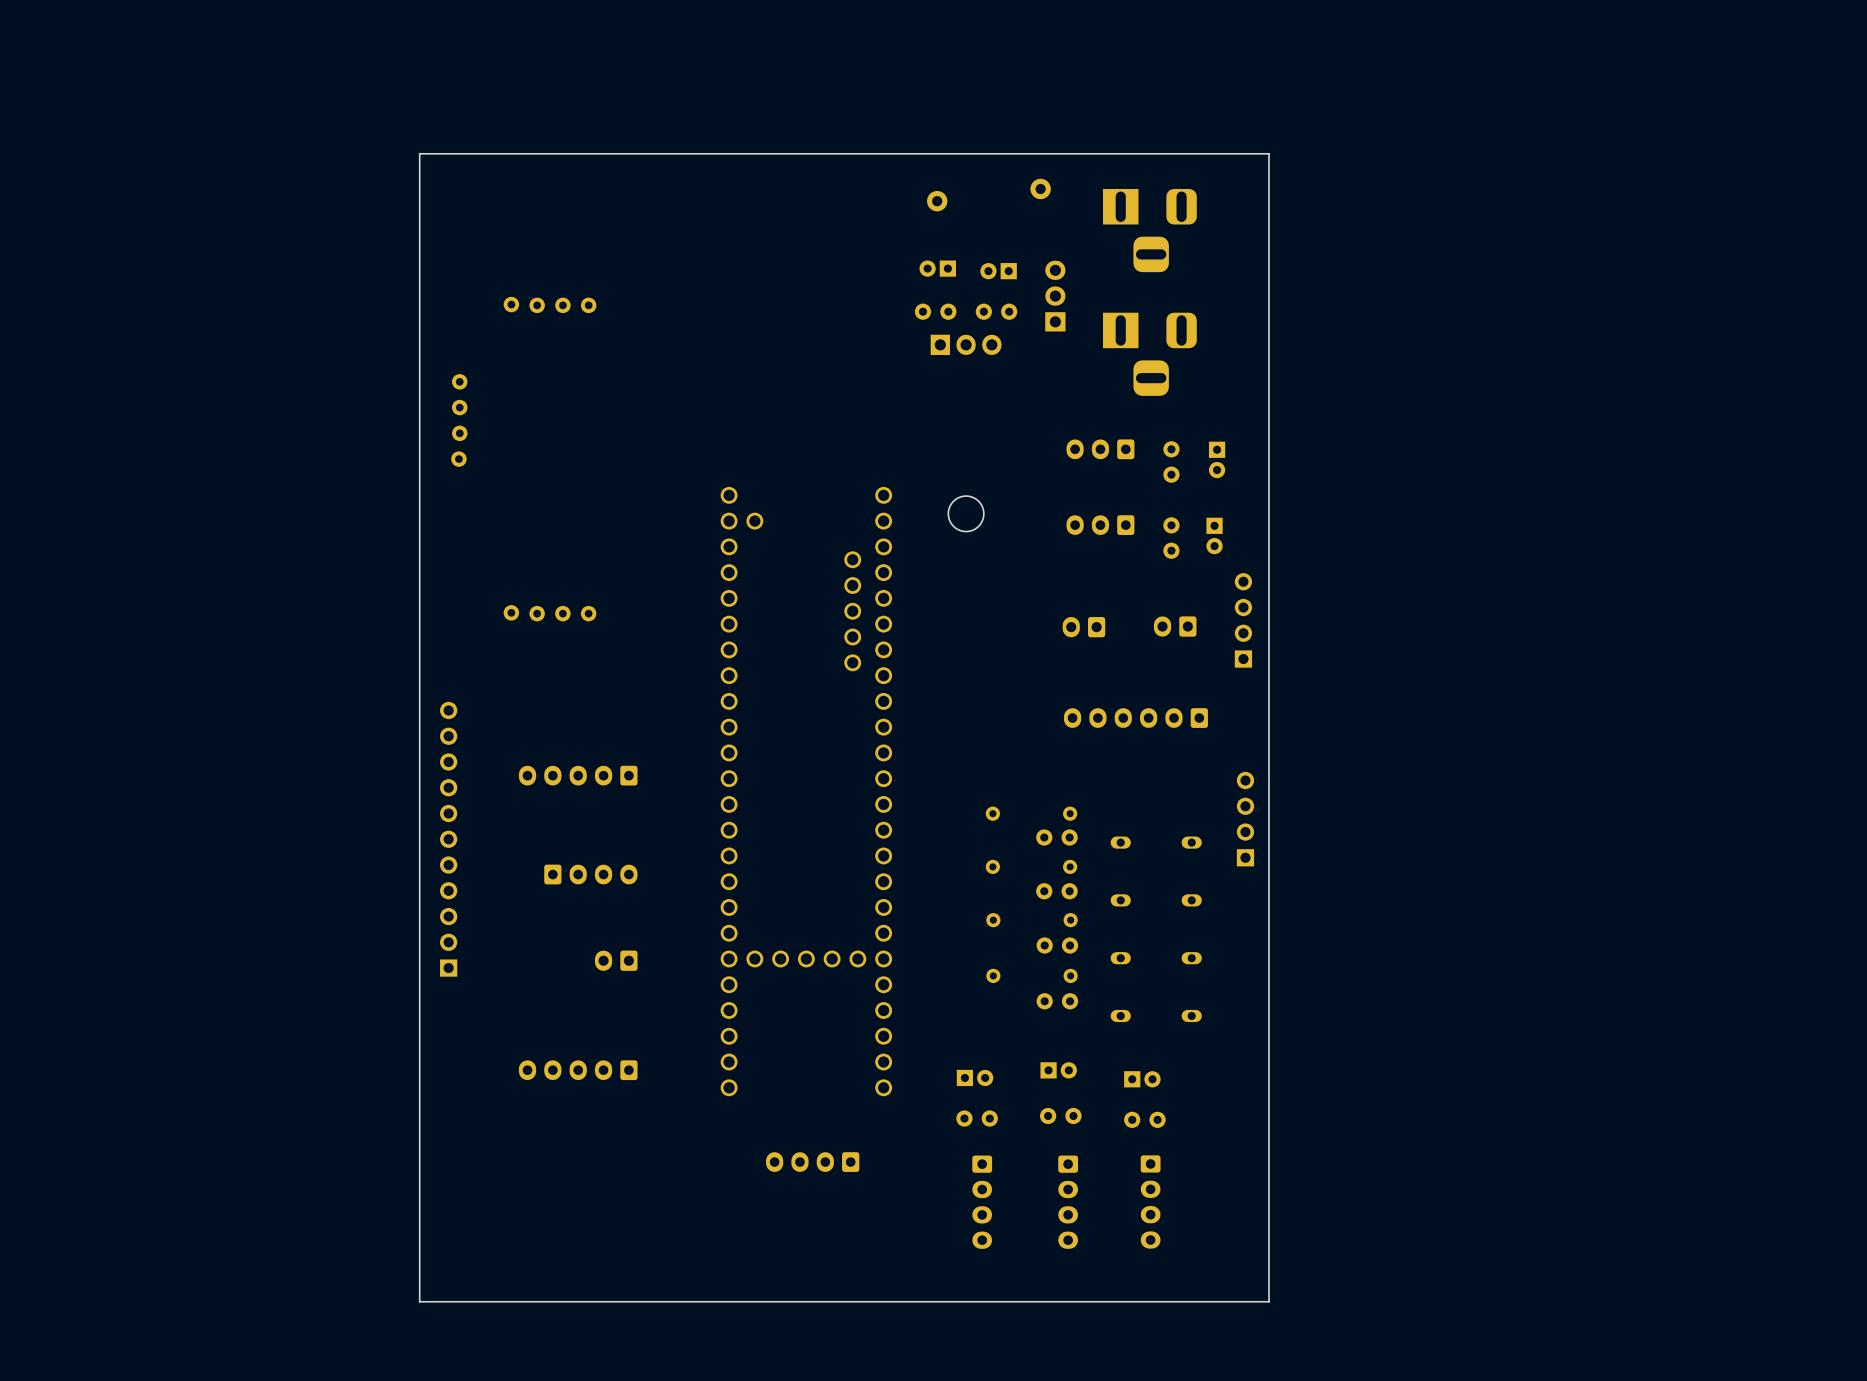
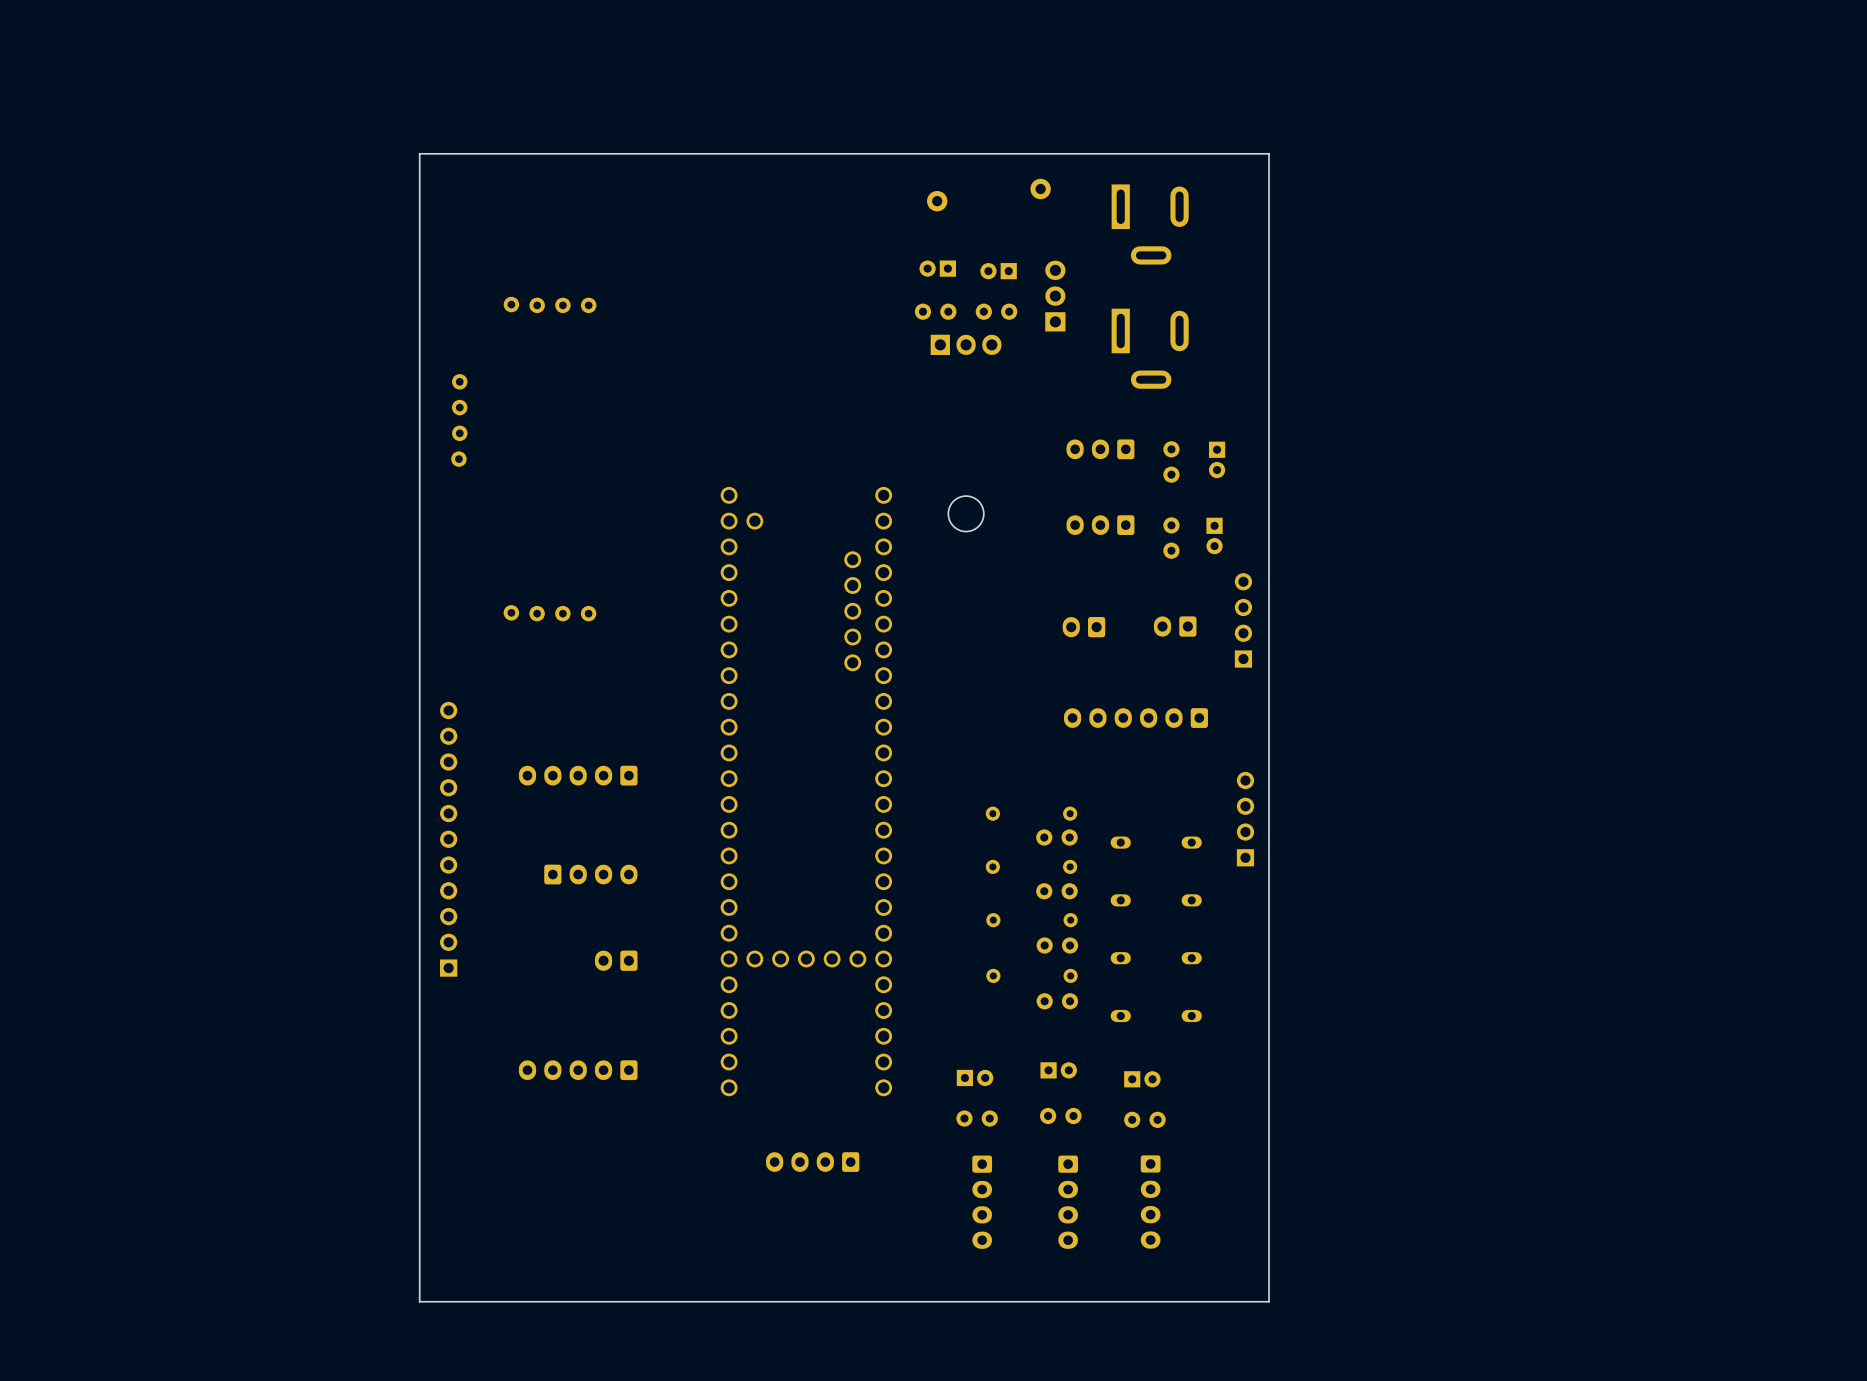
part footprint: [1102, 189, 1197, 273] -> [1111, 184, 1189, 265]
part footprint: [1102, 312, 1197, 396] -> [1111, 308, 1189, 389]

